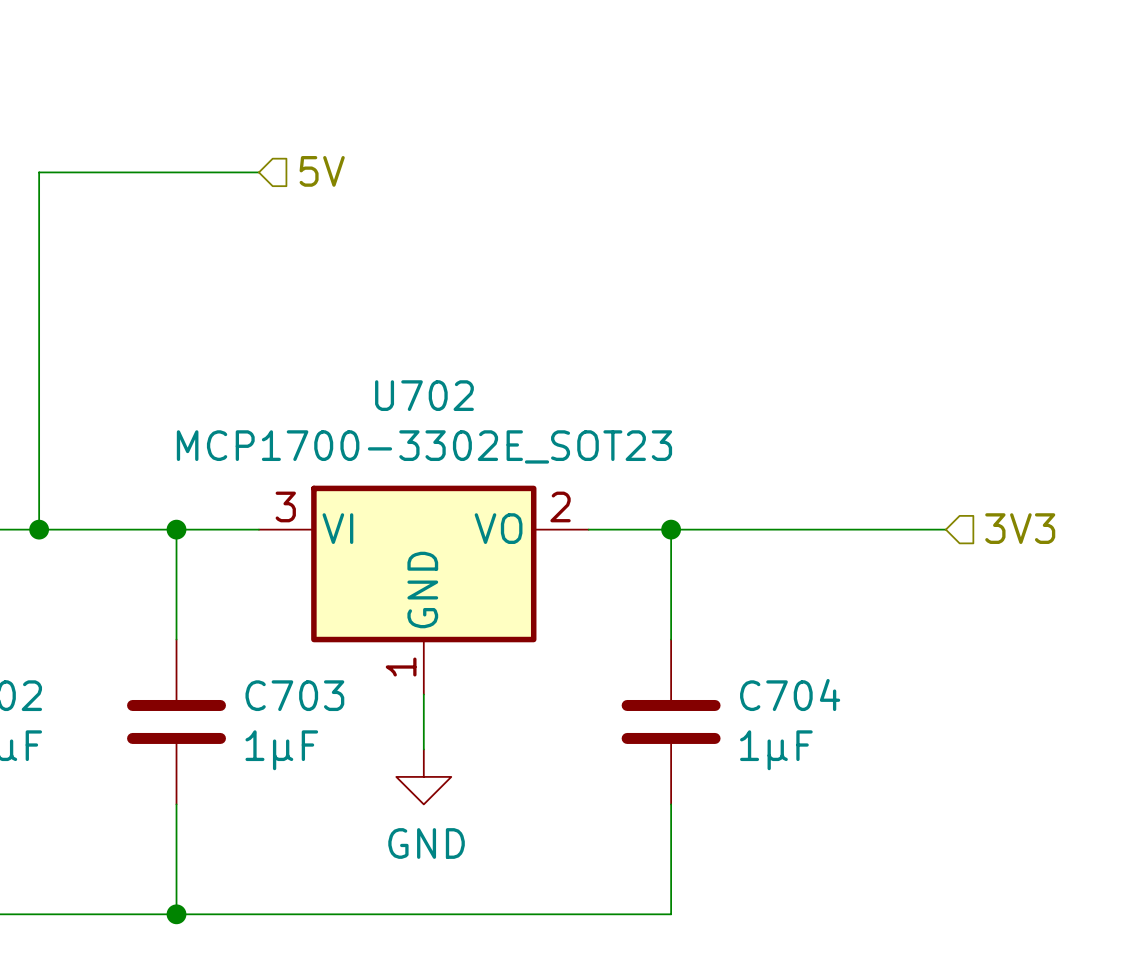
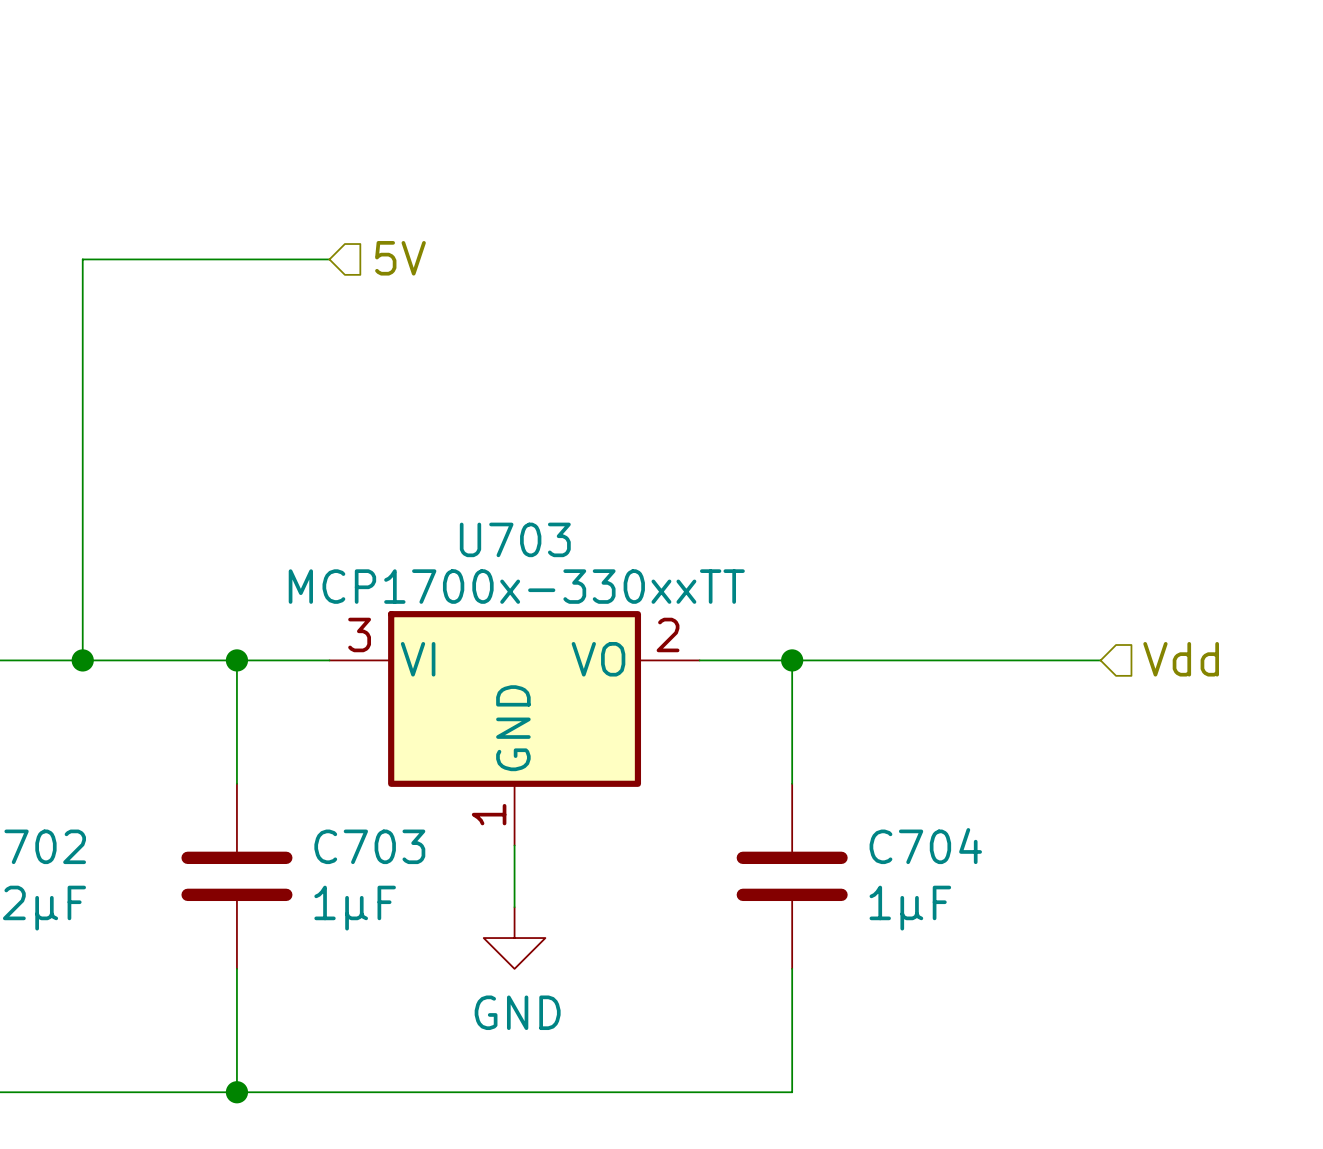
U702 name: U702 (424, 395) -> U703 (515, 539)
U702 value: MCP1700-3302E_SOT23 (424, 446) -> MCP1700x-330xxTT (516, 586)
hierarchical label: 3V3 (1020, 528) -> Vdd (1181, 659)

